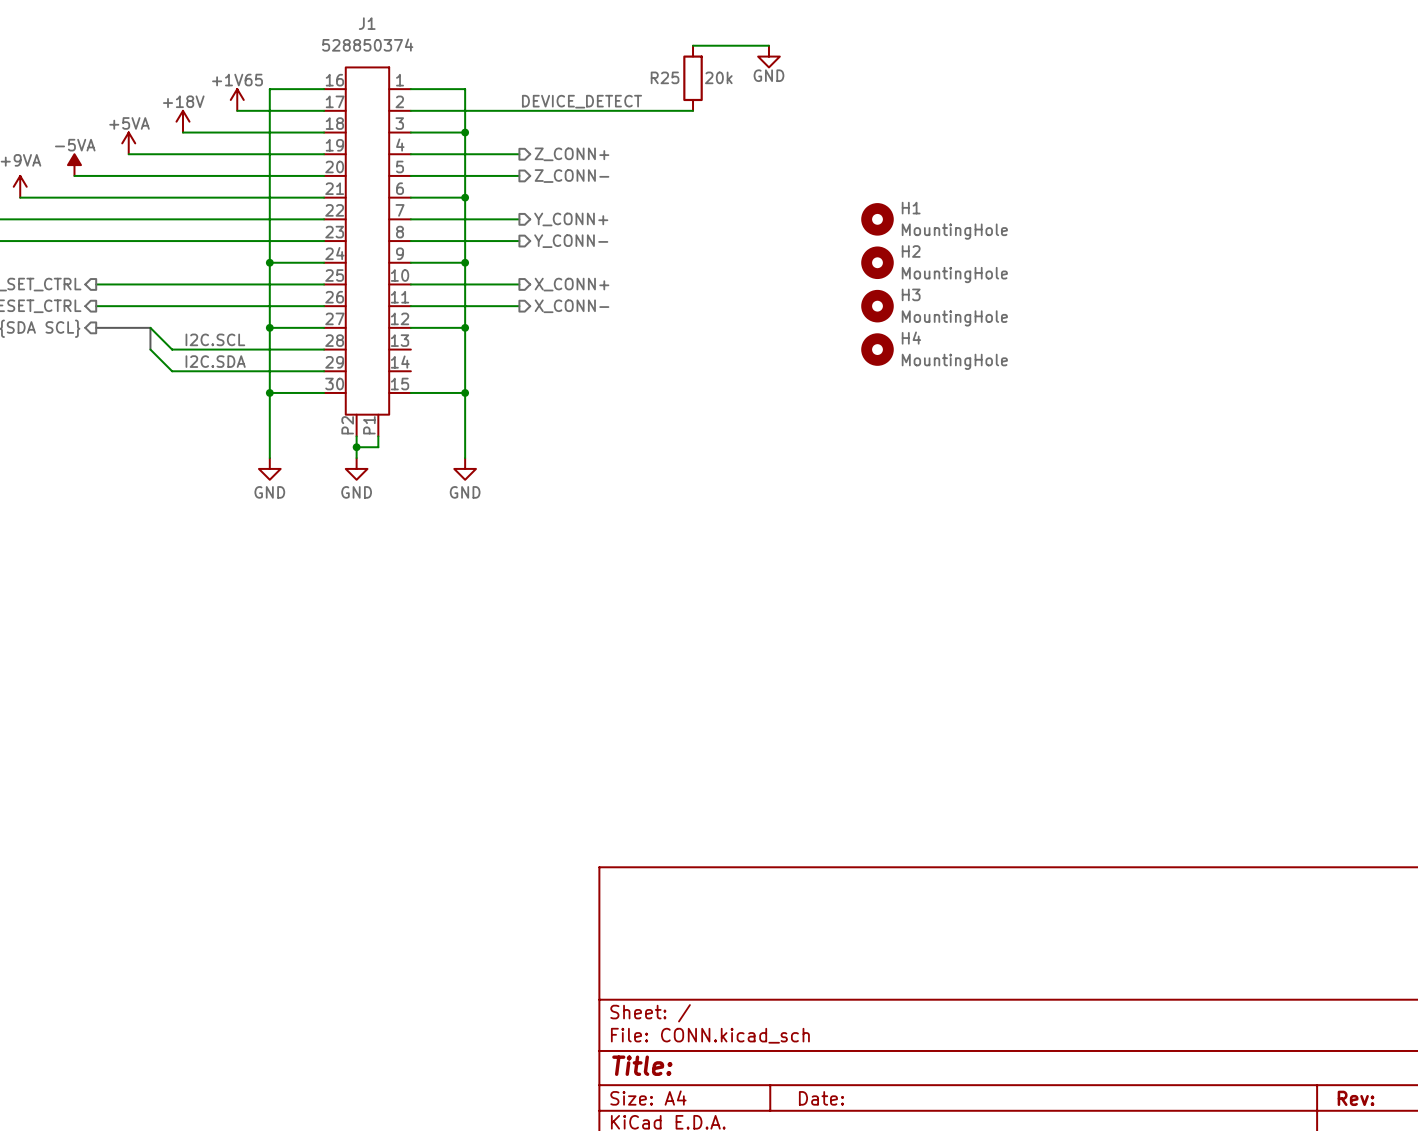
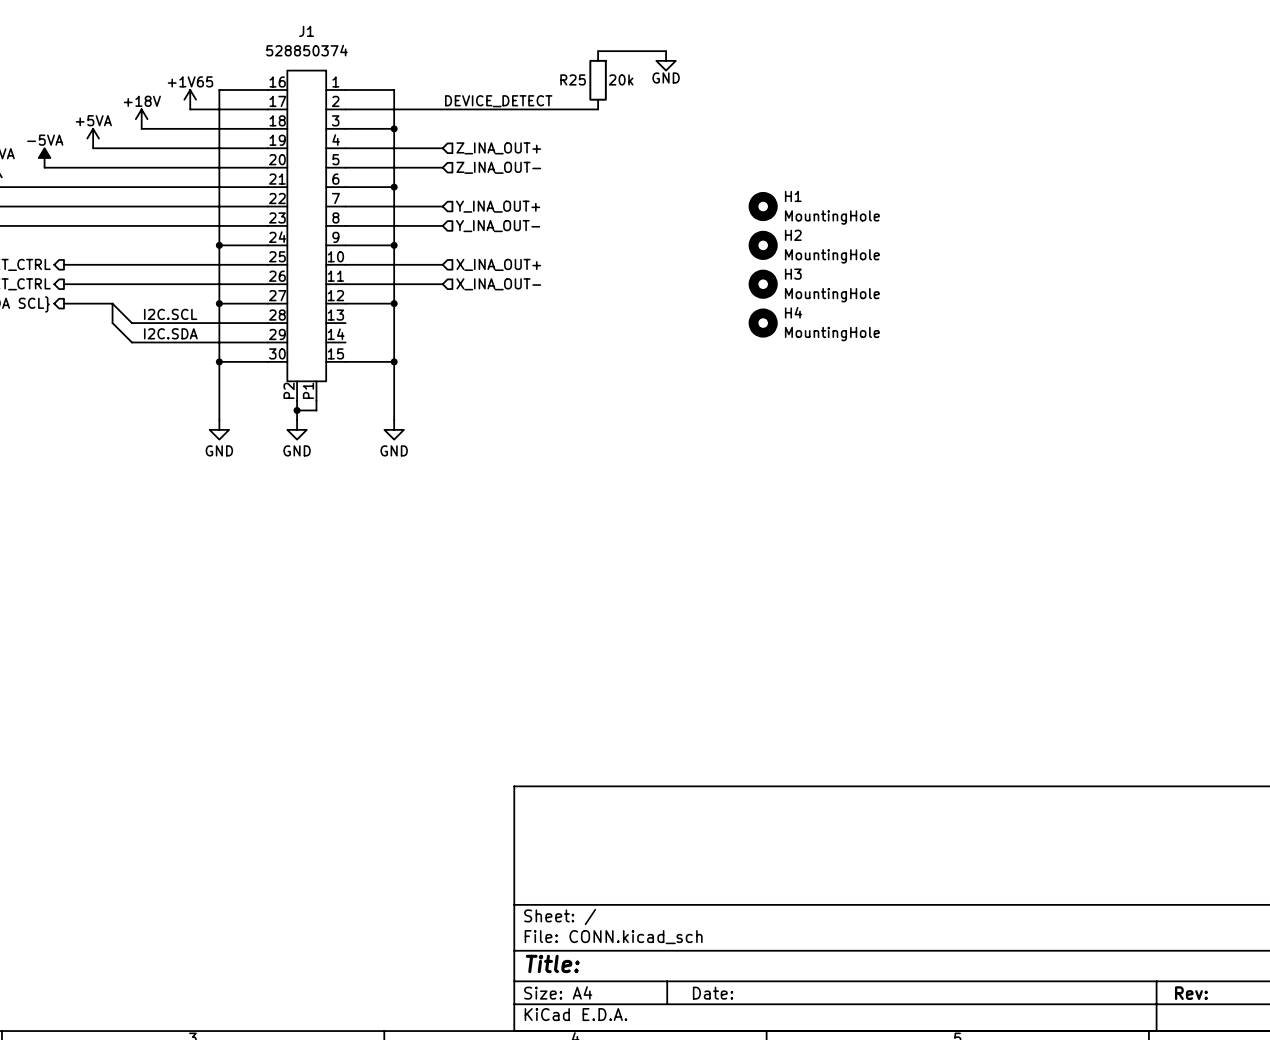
hierarchical label shape: output (572, 154) -> input (498, 148)
hierarchical label: Z_CONN+ (572, 154) -> Z_INA_OUT+ (498, 148)
hierarchical label shape: output (572, 176) -> input (498, 167)
hierarchical label: Z_CONN- (572, 176) -> Z_INA_OUT- (498, 167)
hierarchical label shape: output (571, 219) -> input (498, 206)
hierarchical label: Y_CONN+ (571, 219) -> Y_INA_OUT+ (498, 206)
hierarchical label shape: output (571, 241) -> input (498, 226)
hierarchical label: Y_CONN- (571, 241) -> Y_INA_OUT- (498, 226)
hierarchical label shape: output (572, 284) -> input (498, 264)
hierarchical label: X_CONN+ (572, 284) -> X_INA_OUT+ (498, 264)
hierarchical label shape: output (572, 306) -> input (498, 284)
hierarchical label: X_CONN- (572, 306) -> X_INA_OUT- (498, 284)

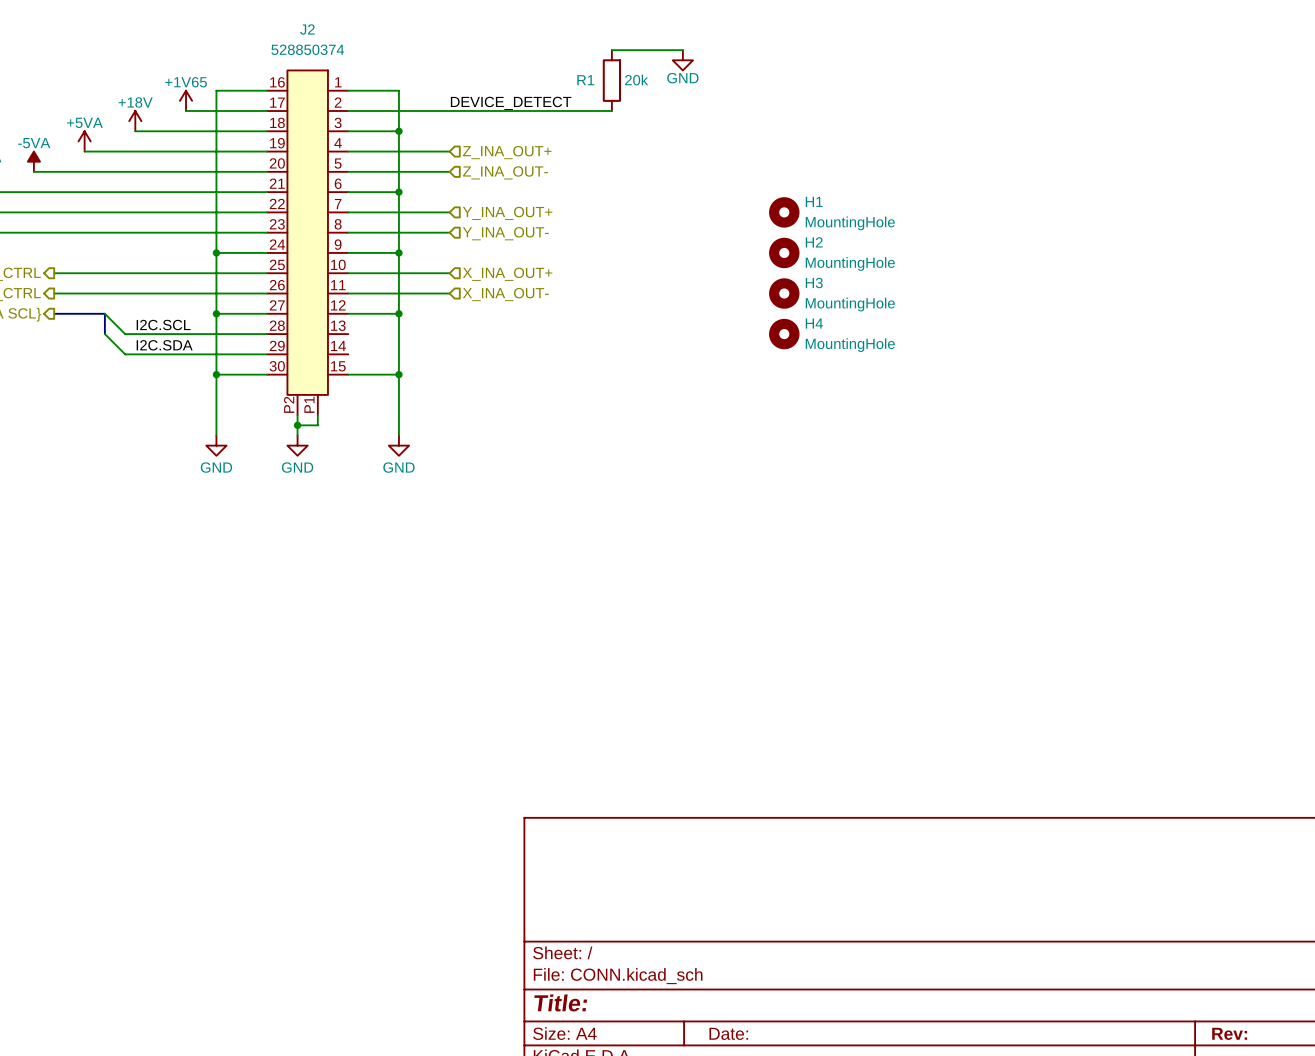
J1 name: J1 (306, 31) -> J2 (307, 29)
R25 name: R25 (573, 79) -> R1 (585, 80)

